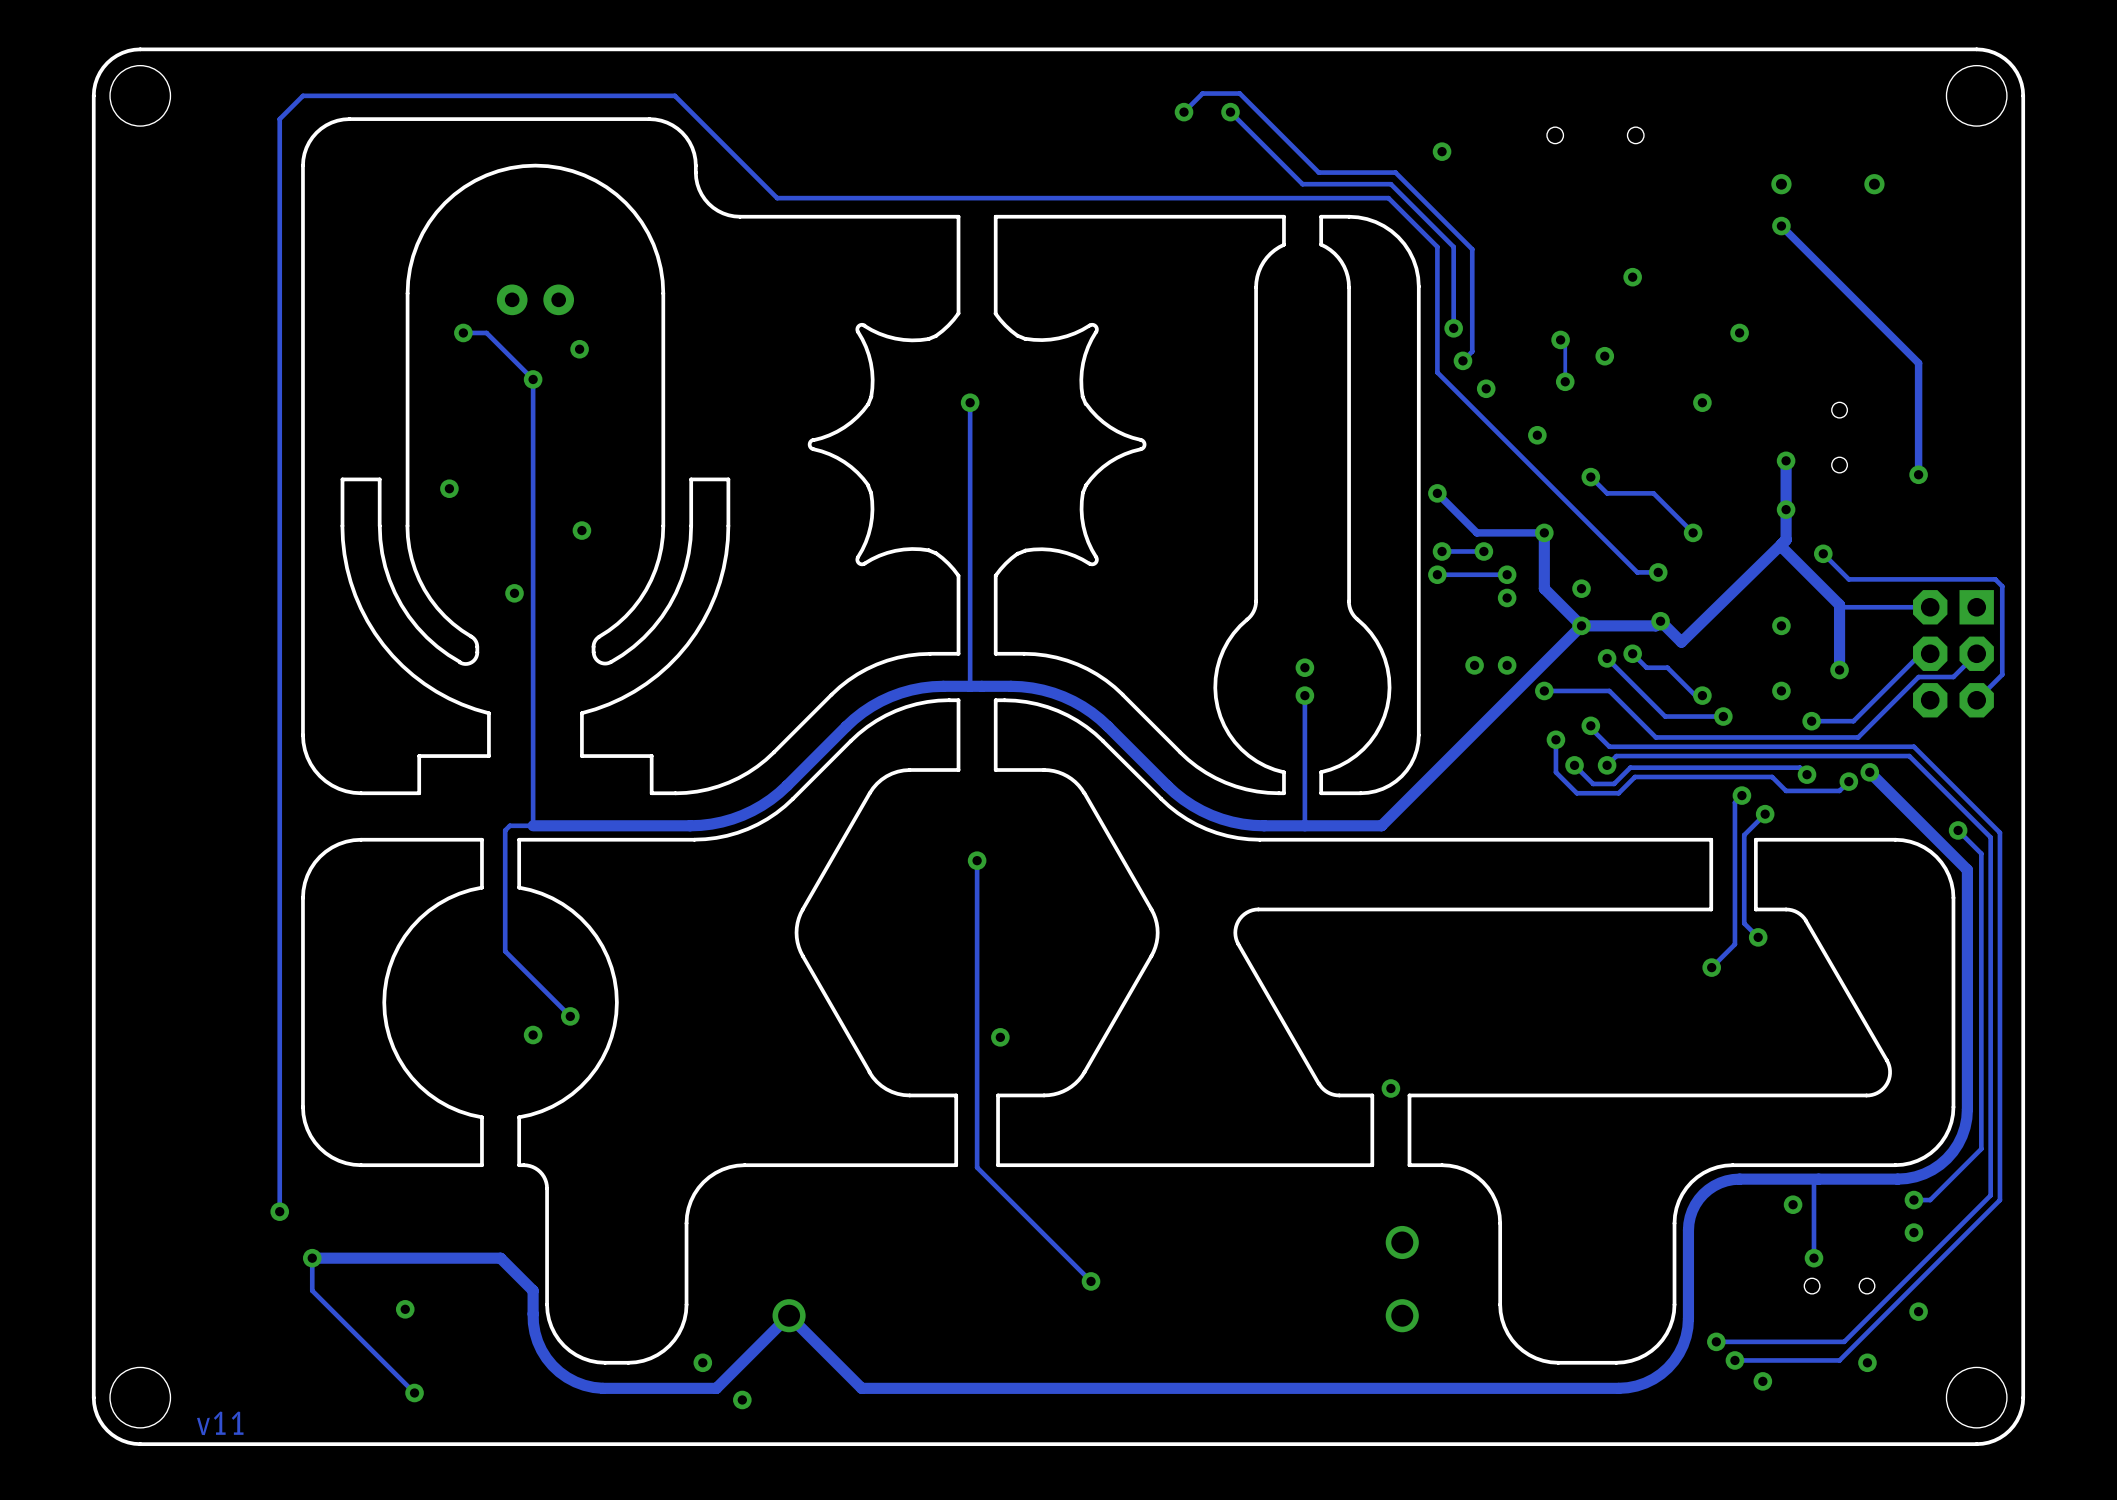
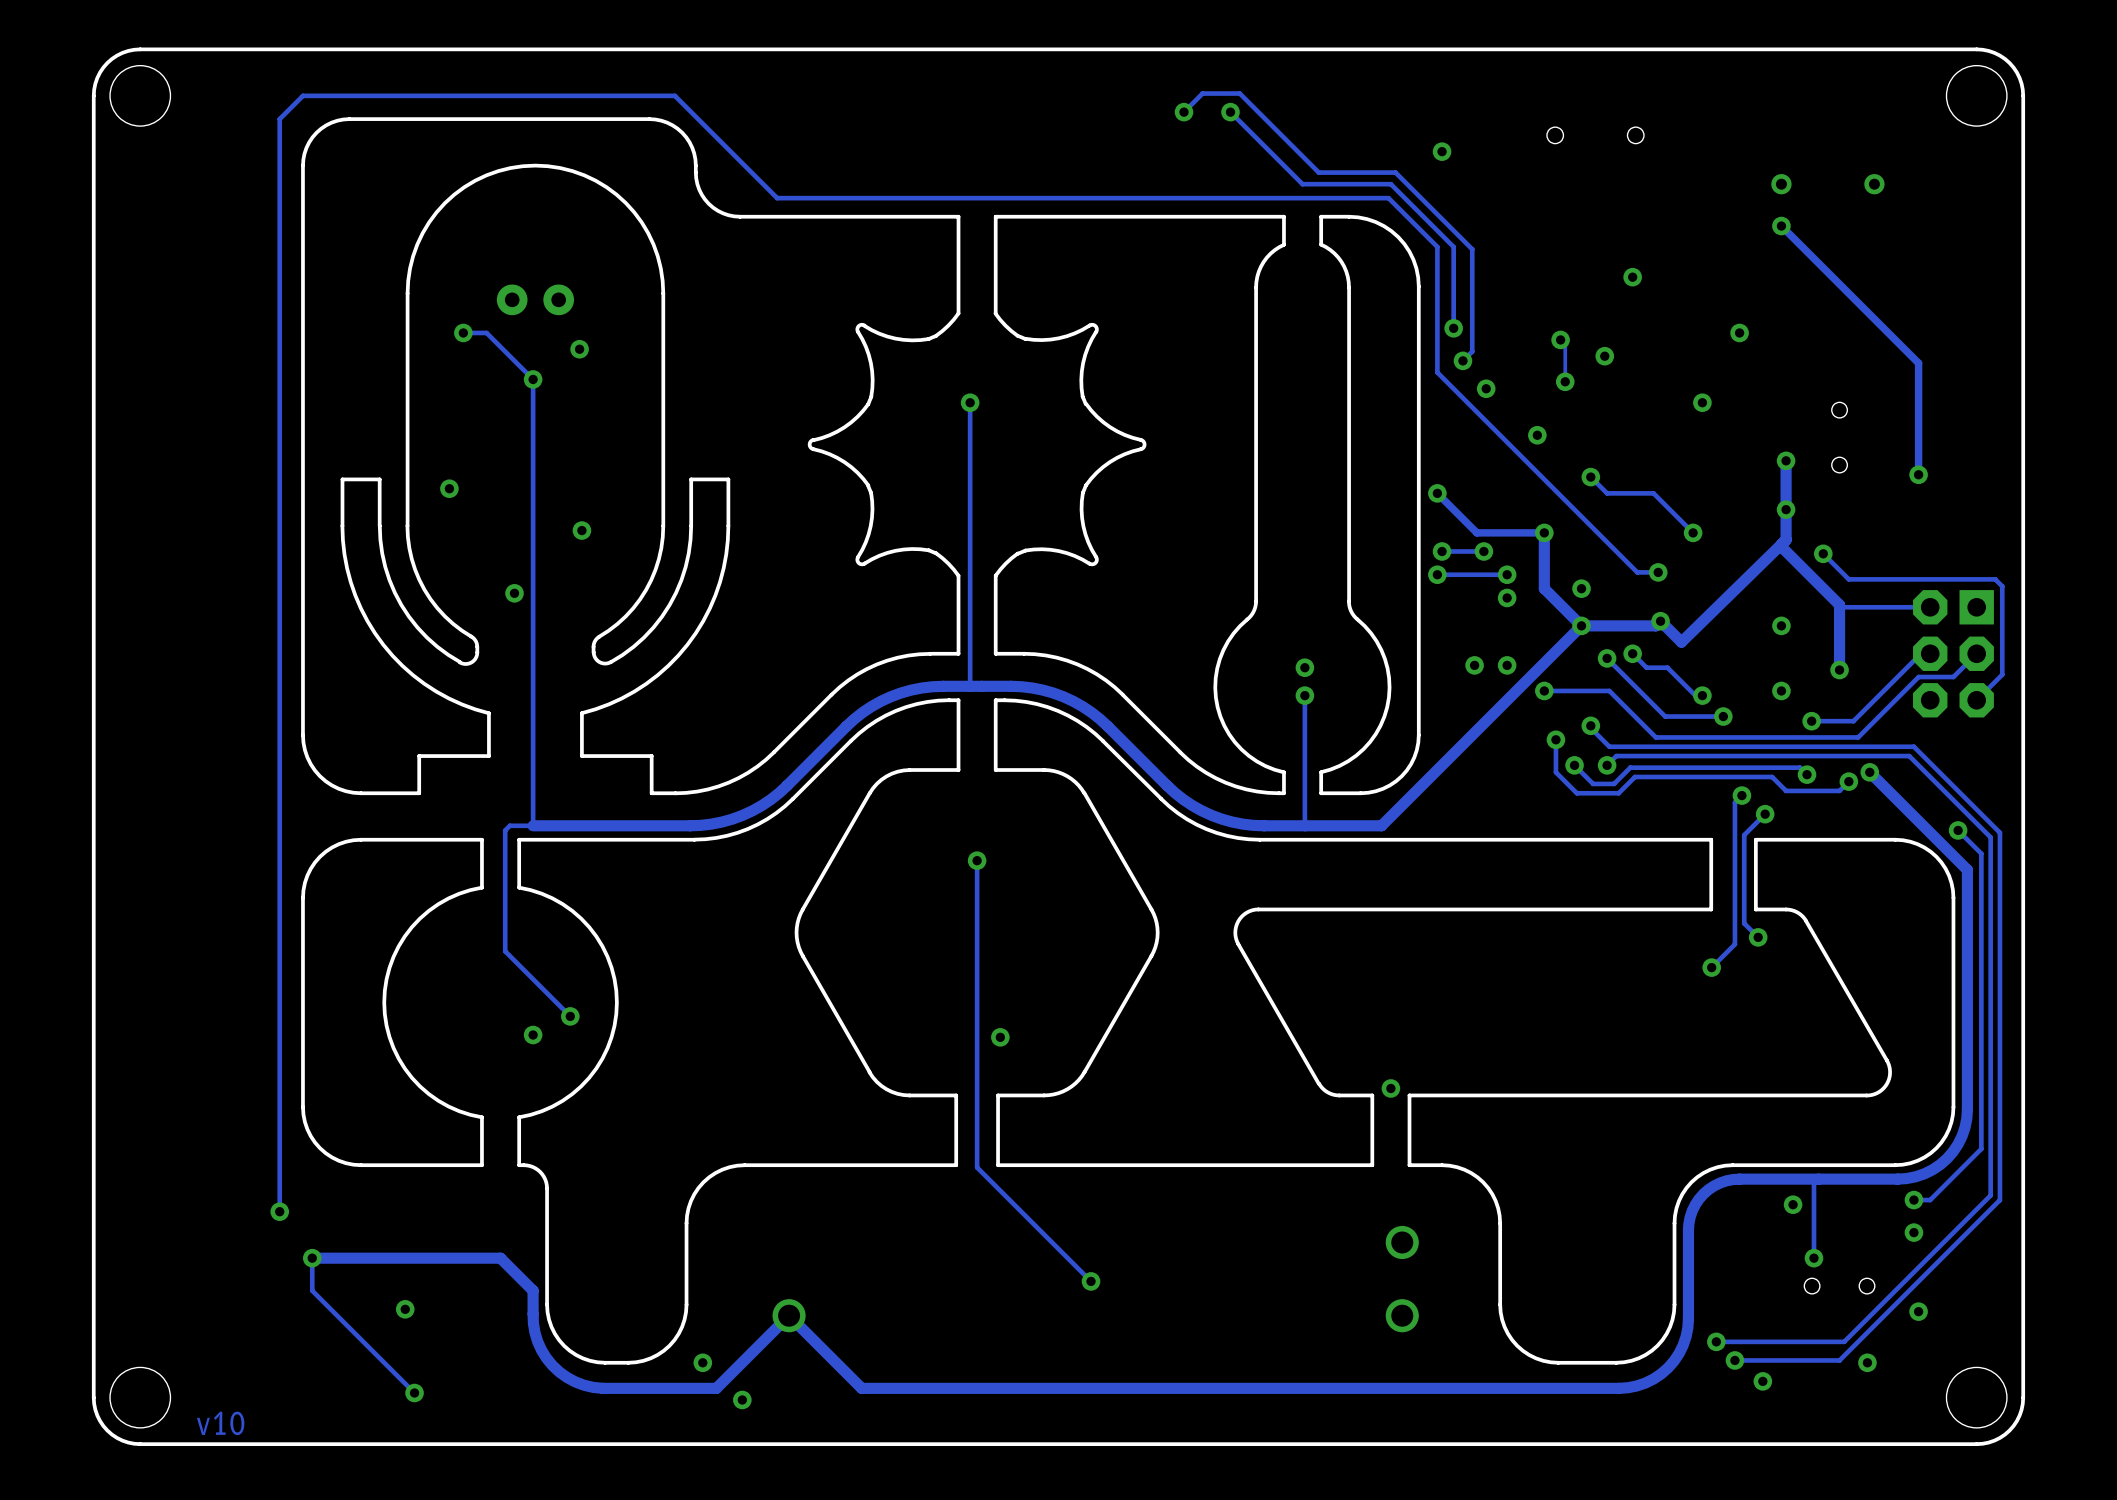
text: v11 (220, 1423) -> v10 (220, 1423)

